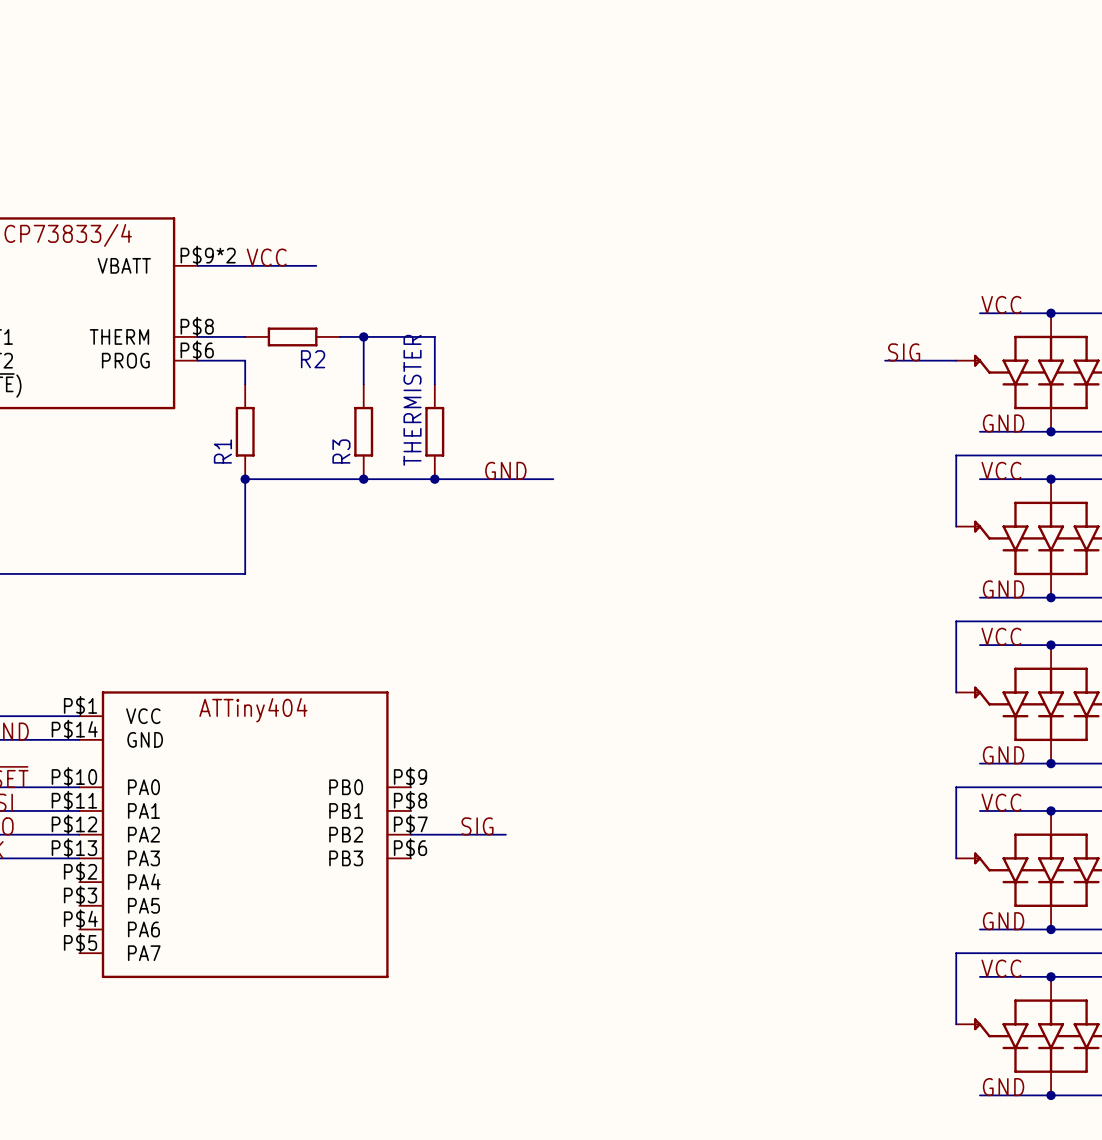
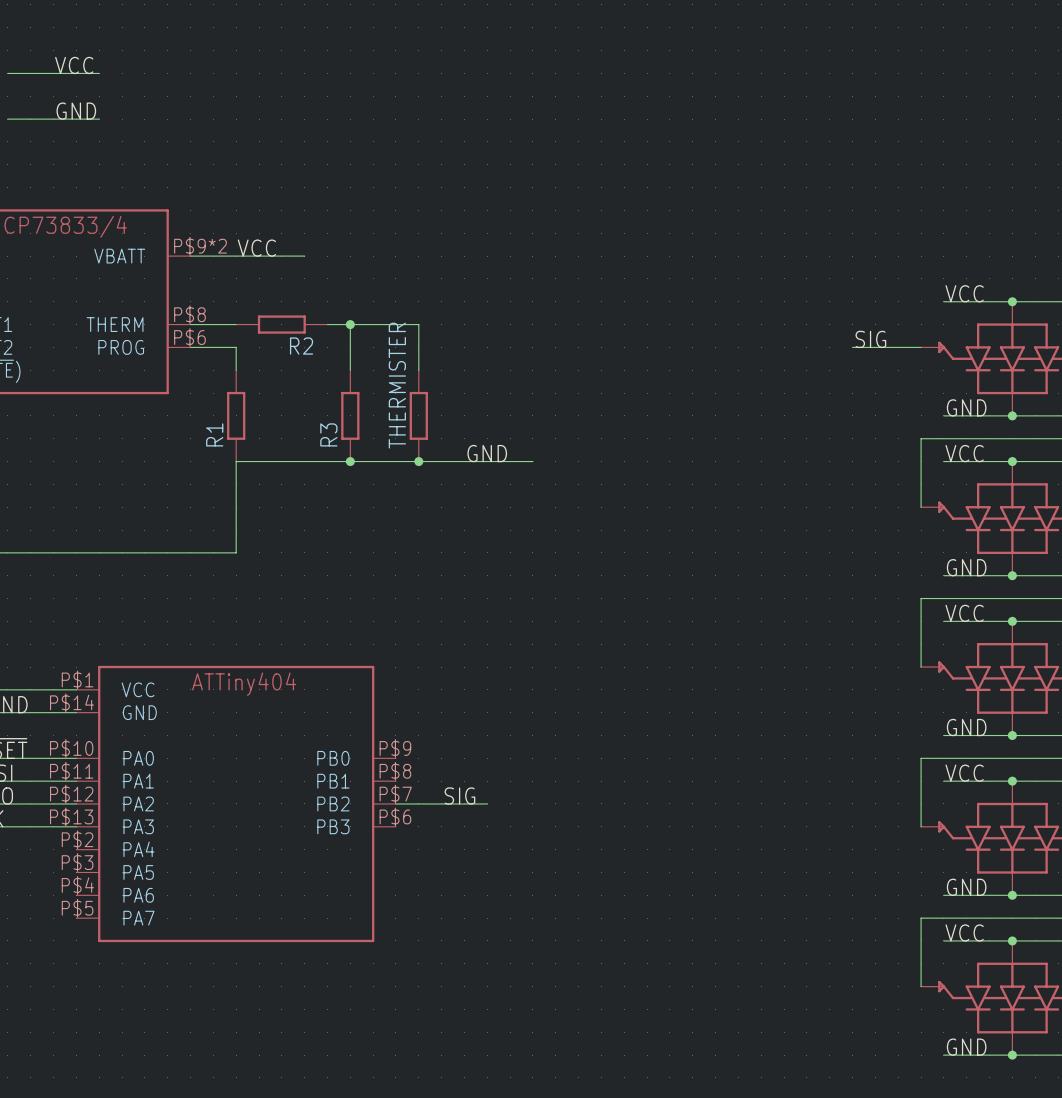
label: none -> VCC (74, 65)
wire: none -> (7, 73) (99, 73)
label: none -> GND (76, 111)
wire: none -> (7, 119) (99, 119)
junction: (245, 479) -> none

